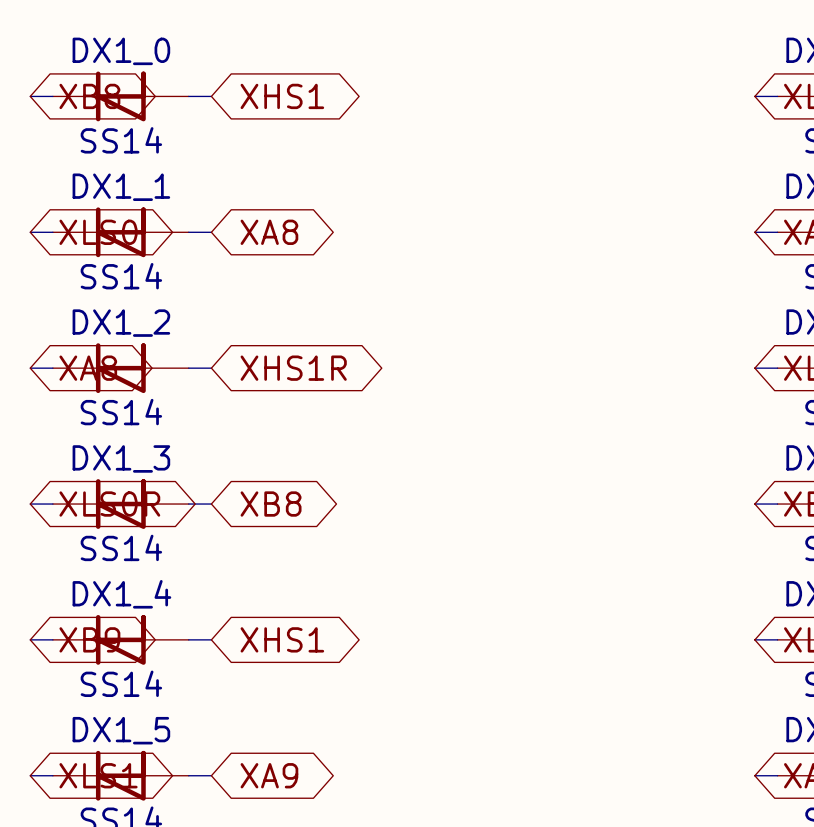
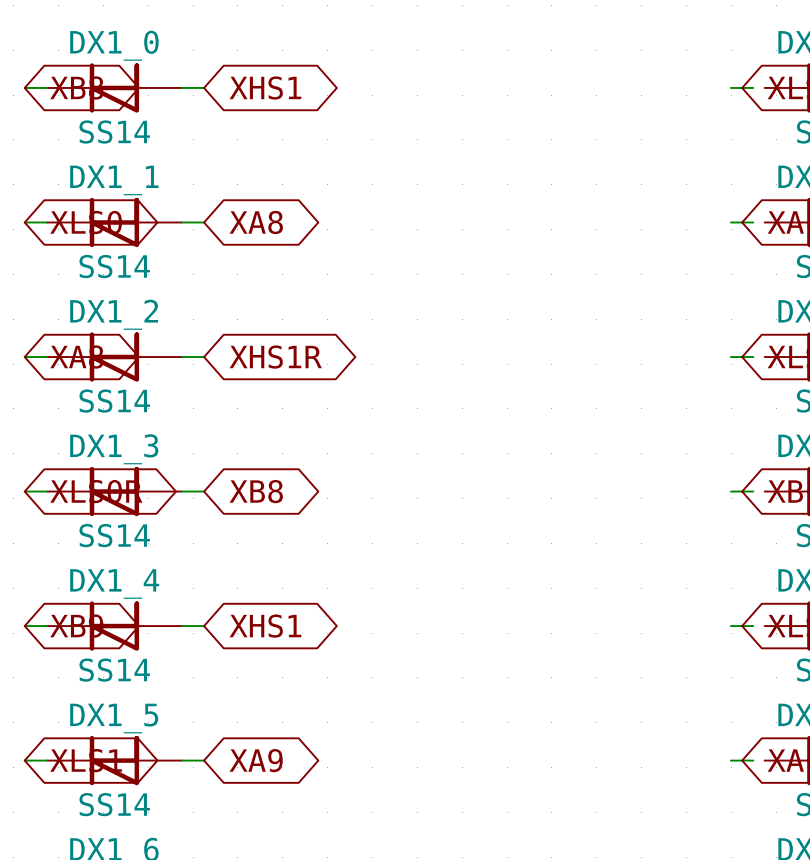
wire: (766, 96) (777, 96) -> (730, 87) (742, 87)
wire: (766, 232) (777, 232) -> (730, 222) (742, 222)
wire: (766, 368) (777, 368) -> (730, 357) (742, 357)
wire: (766, 504) (777, 504) -> (730, 491) (742, 491)
wire: (766, 639) (777, 639) -> (730, 626) (742, 626)
wire: (766, 775) (777, 775) -> (730, 760) (742, 760)

